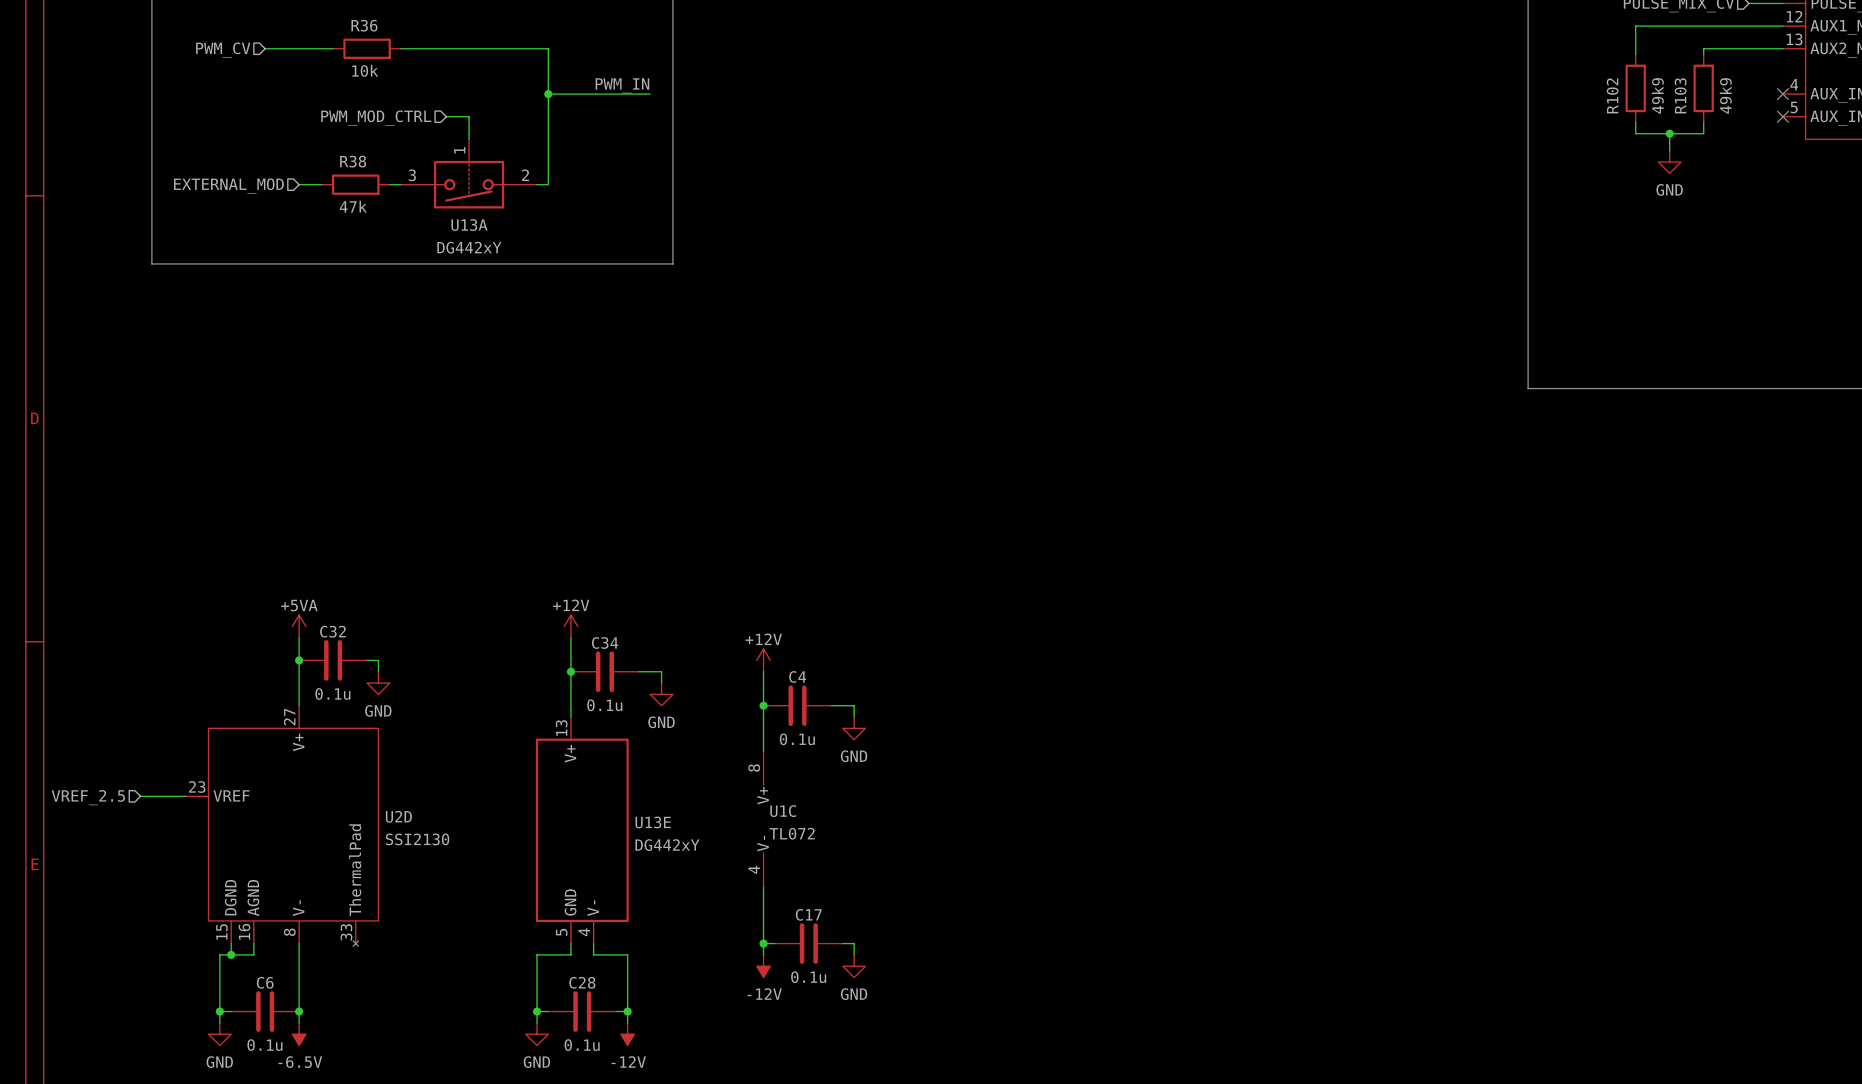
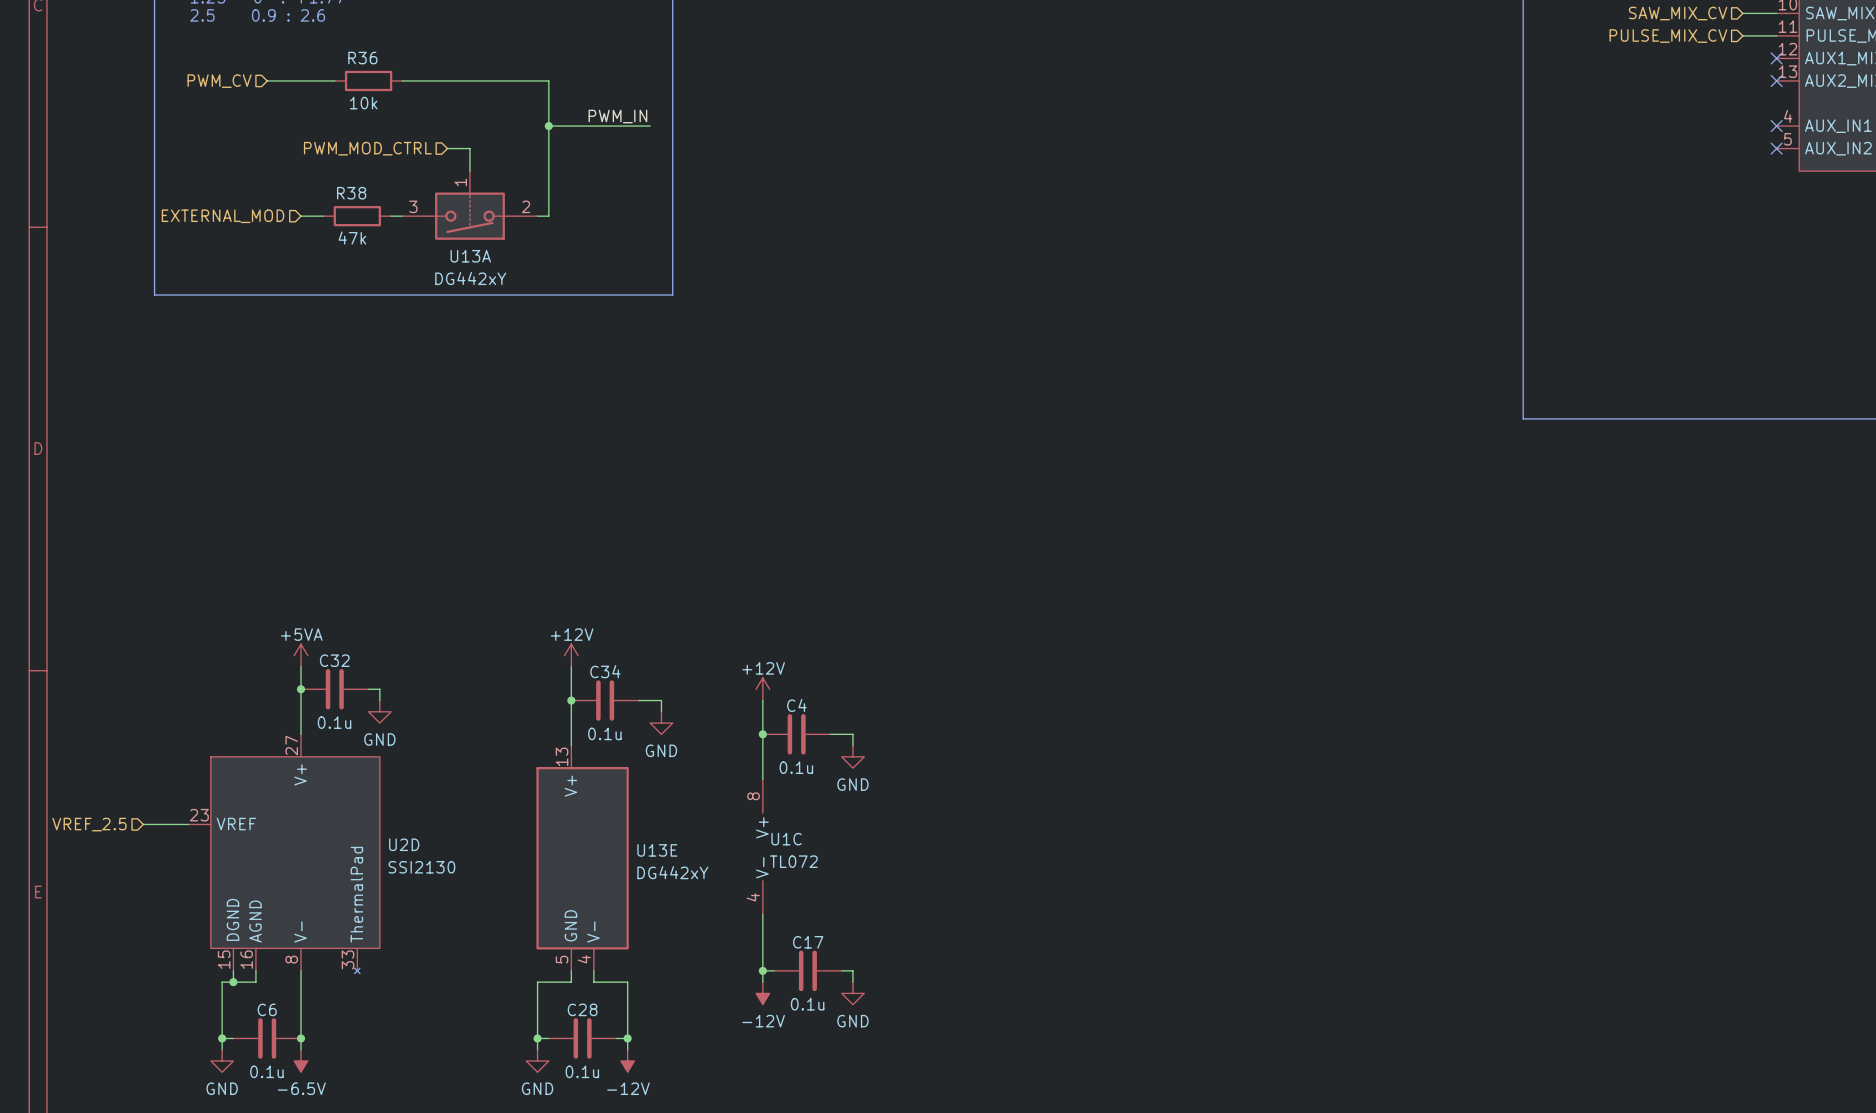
wire: (1782, 26) (1635, 26) (1635, 54) -> none
no-connect mark: none -> (1776, 58)
wire: (1782, 48) (1703, 48) (1703, 54) -> none
no-connect mark: none -> (1776, 80)
R102: 49k9 (1635, 88) -> none
R103: 49k9 (1703, 88) -> none
wire: (1635, 122) (1635, 133) (1703, 133) (1703, 122) -> none
wire: (1669, 133) (1669, 150) -> none
junction: (1669, 133) -> none
power symbol: GND (1669, 162) -> none

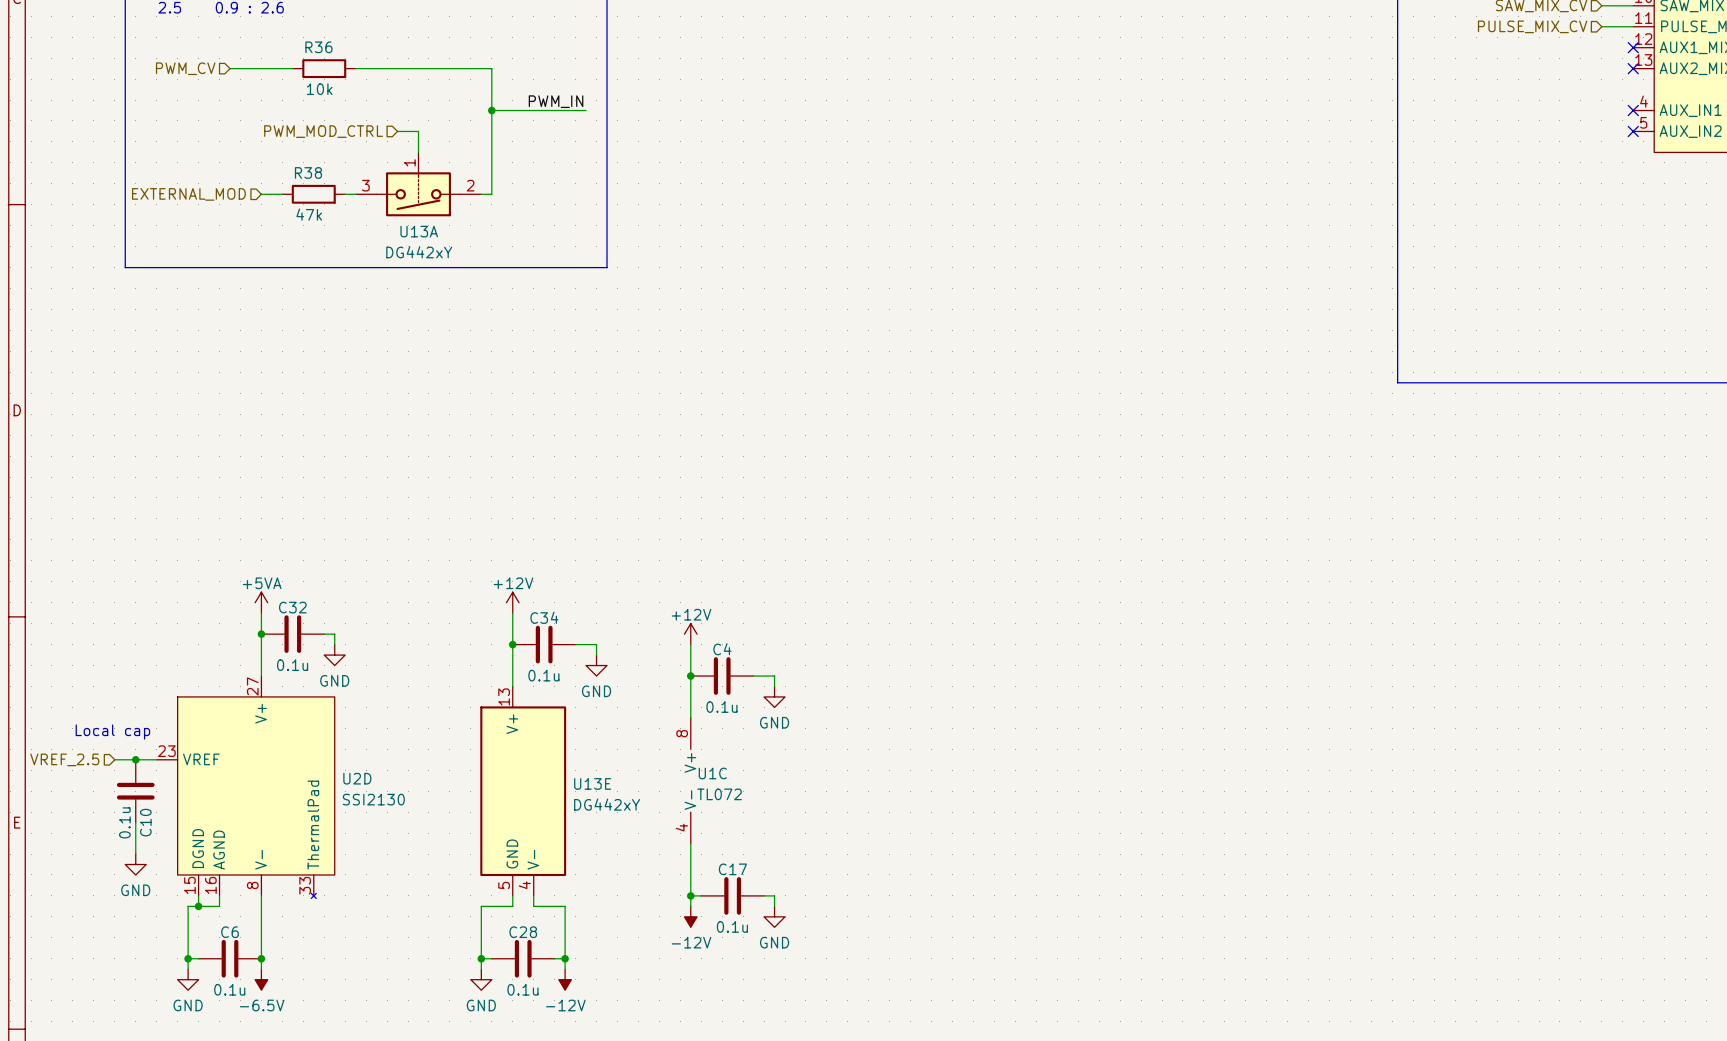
text: none -> Local cap (112, 732)
junction: none -> (135, 759)
C10: none -> 0.1u (135, 791)
wire: none -> (135, 822) (135, 854)
power symbol: none -> GND (135, 864)

